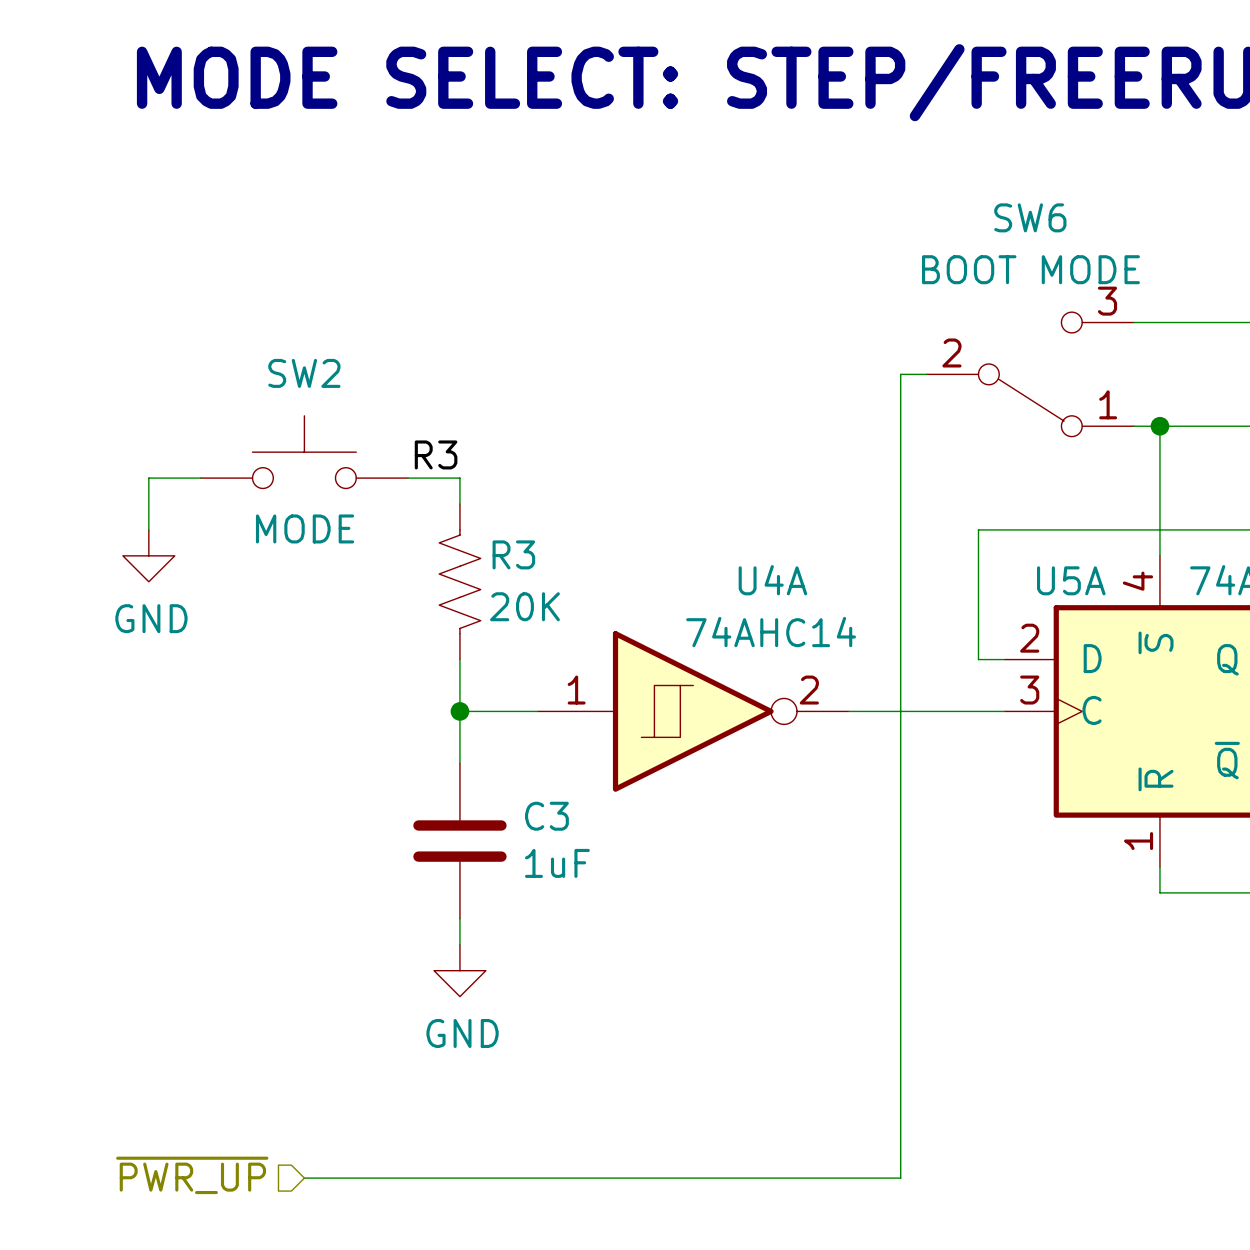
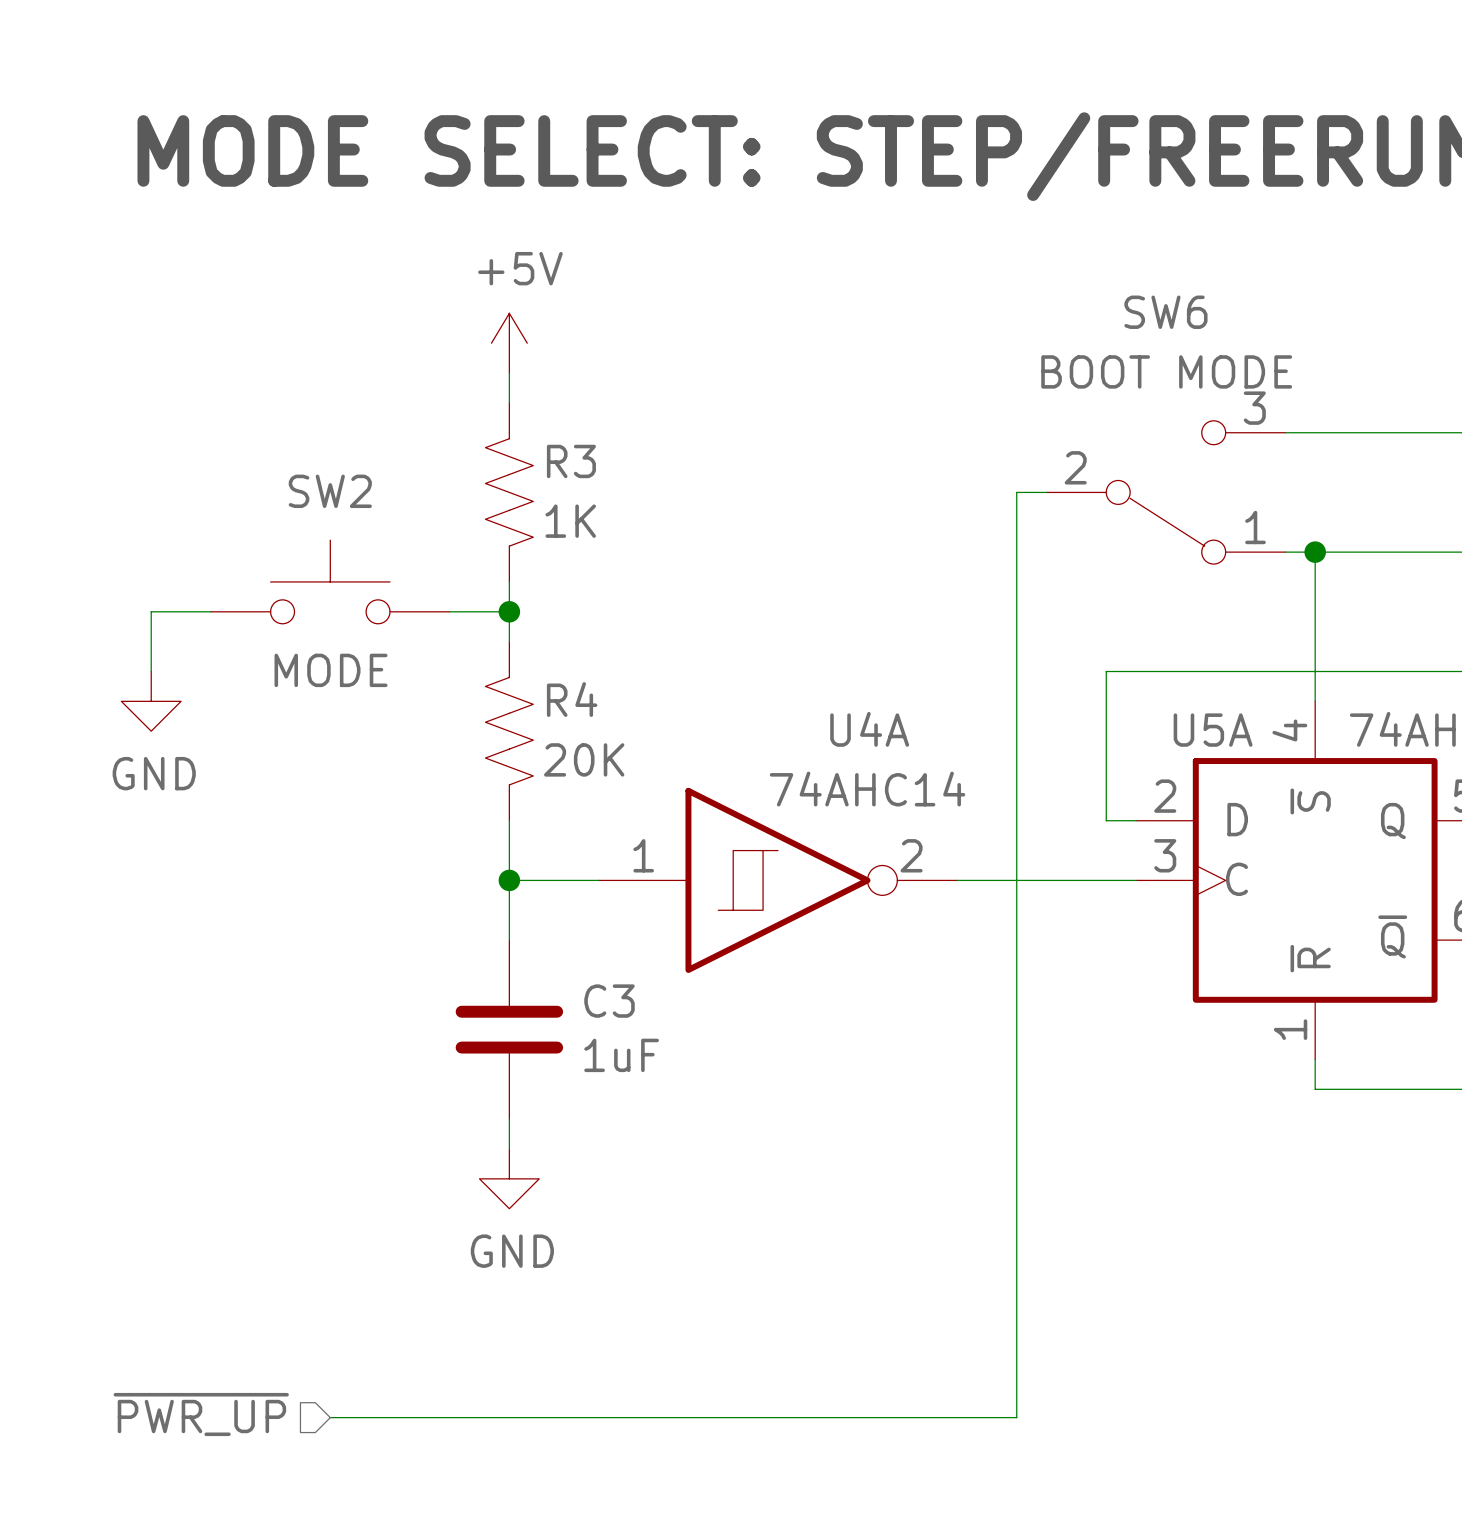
power symbol: none -> +5V (509, 343)
wire: none -> (509, 373) (509, 402)
R3: none -> 1K (509, 492)
wire: none -> (509, 581) (509, 611)
label: R3 (436, 454) -> none
junction: none -> (509, 611)
R3 name: R3 (513, 554) -> R4 (572, 699)

